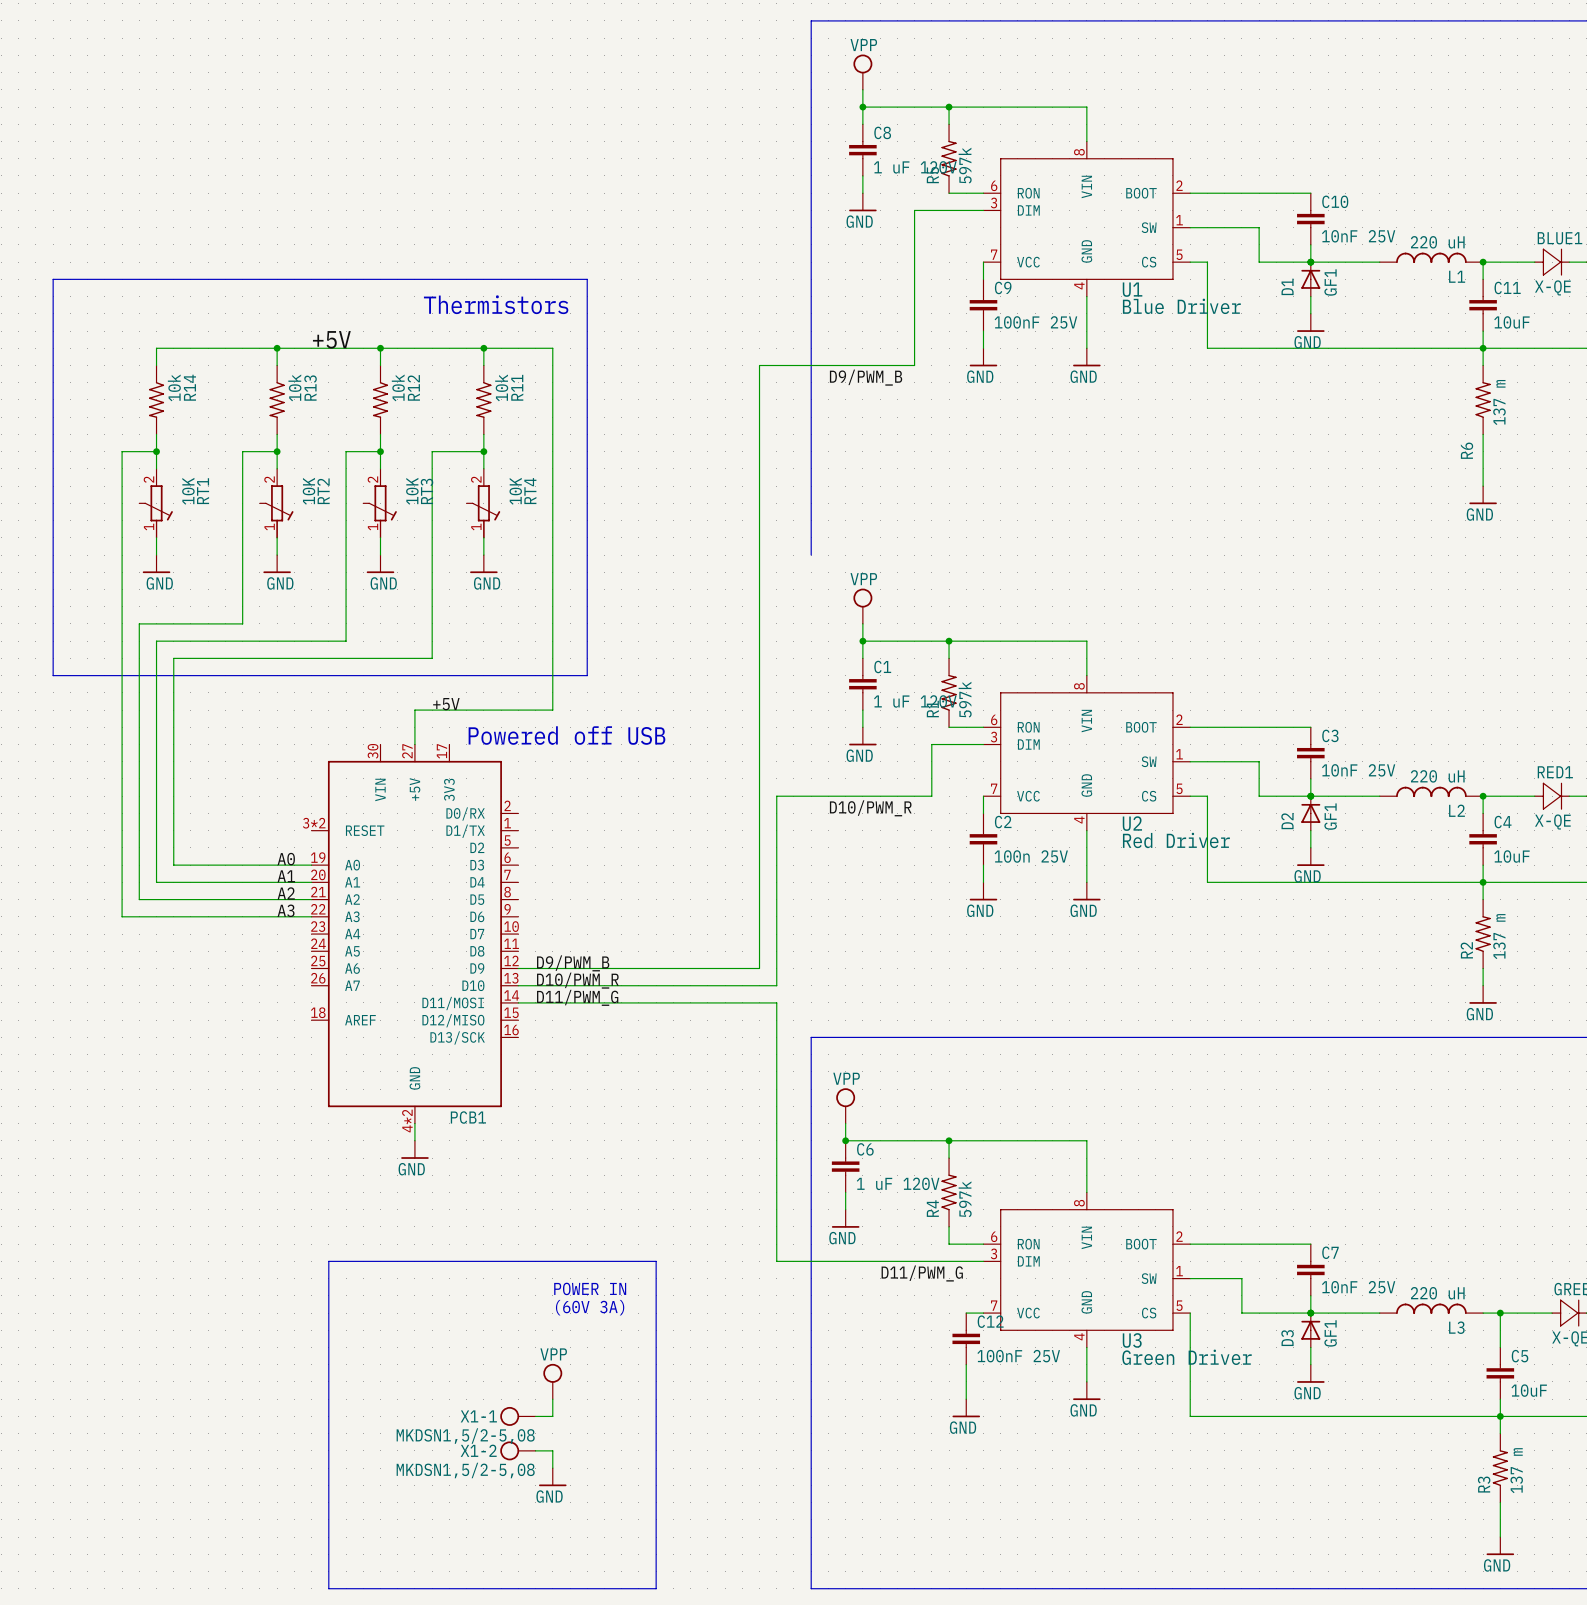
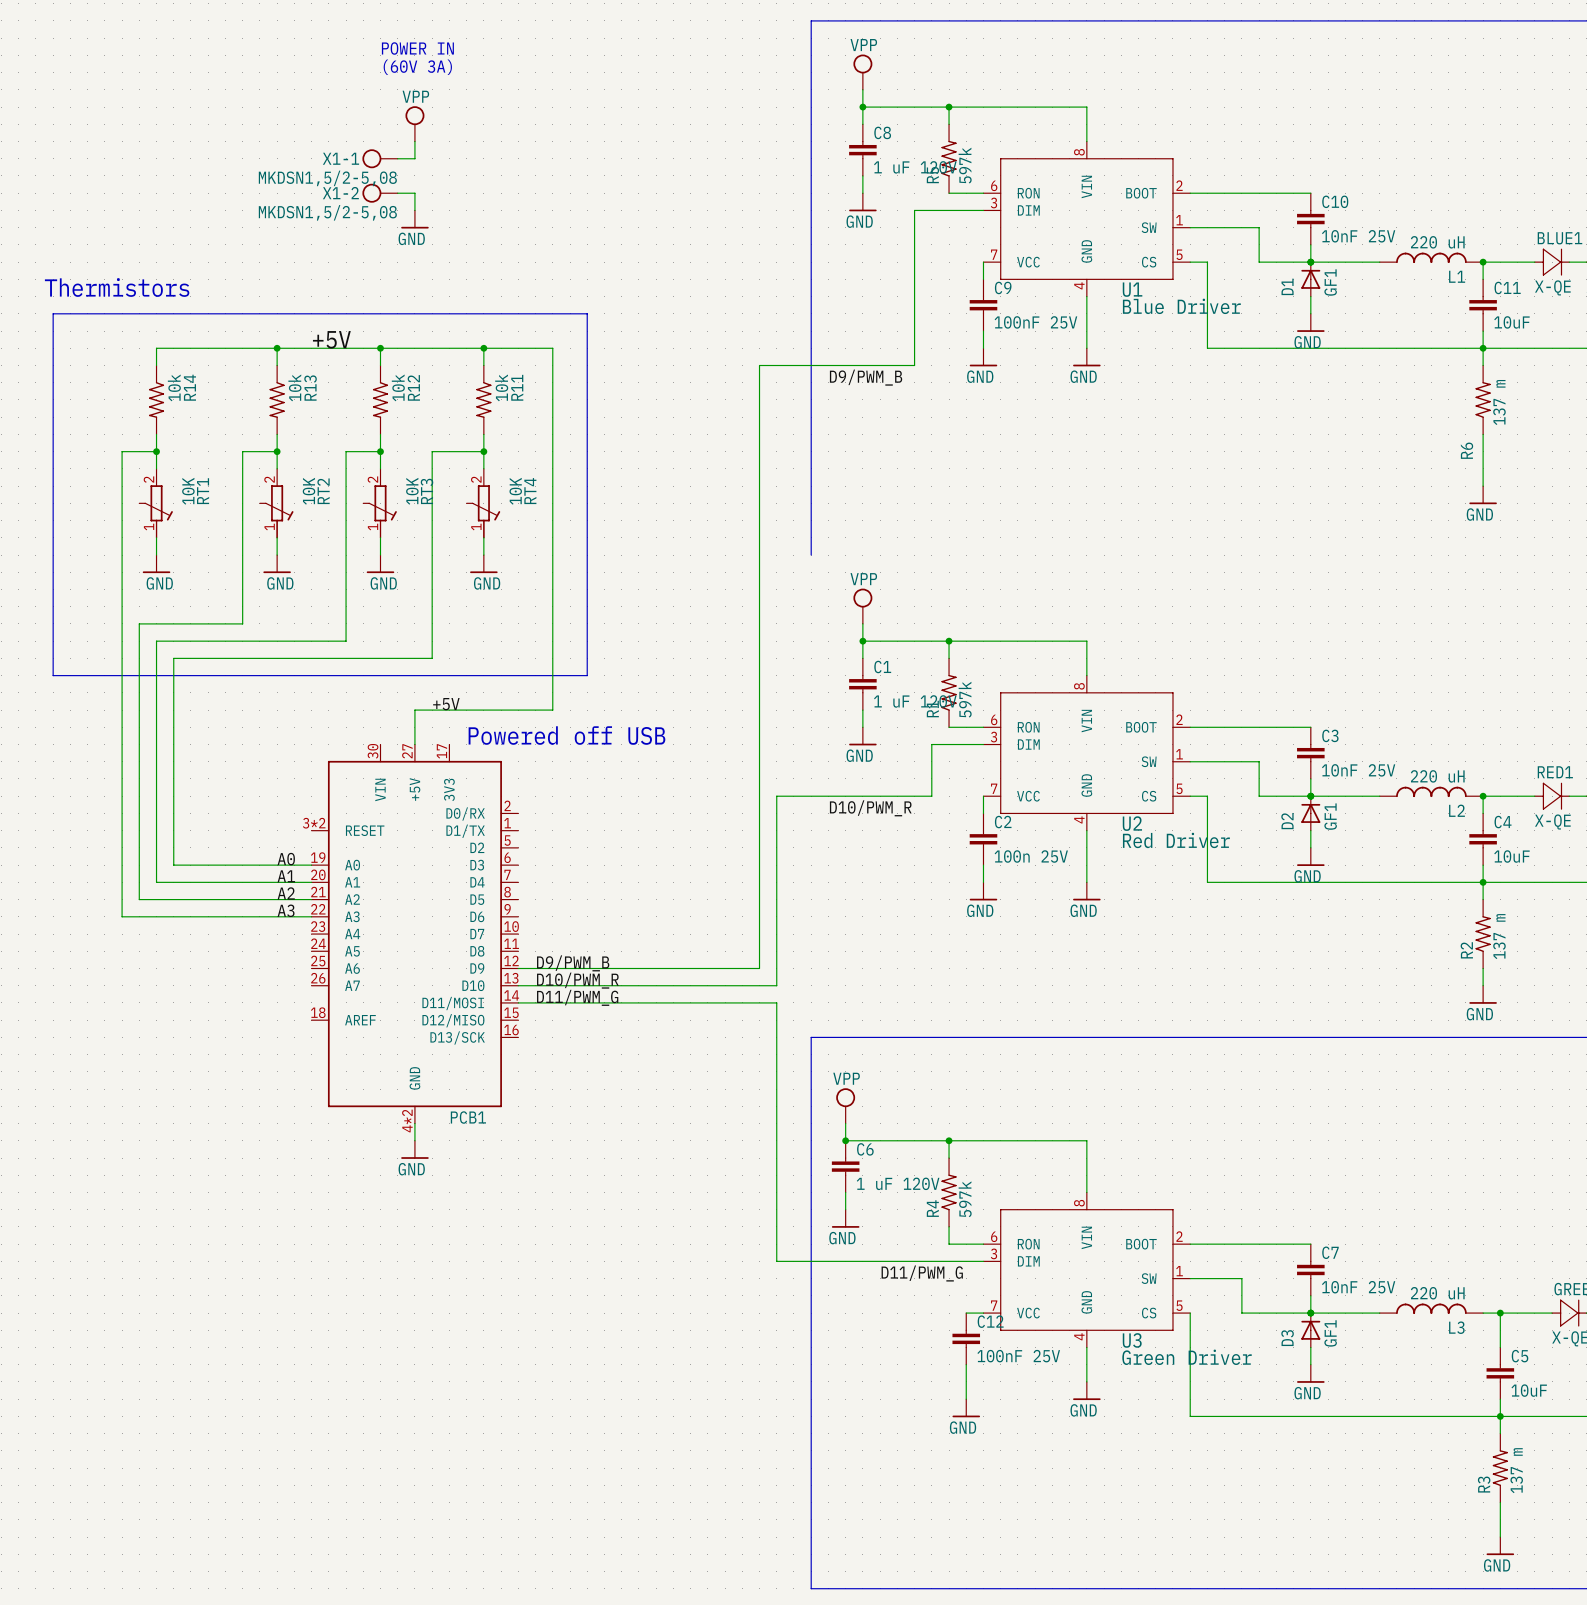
text: none -> POWER IN (417, 48)
text: none -> (60V 3A) (417, 67)
power symbol: none -> VPP (414, 123)
wire: none -> (414, 141) (414, 158) (397, 158)
wire: none -> (397, 193) (414, 193) (414, 210)
power symbol: none -> GND (414, 219)
text: none -> Thermistors (117, 287)
text: Thermistors (496, 304) -> none
line: (53, 313) (53, 279) (587, 279) (587, 313) -> (53, 313) (587, 313)
line: (328, 1261) (656, 1261) (656, 1588) (328, 1588) (328, 1261) -> none
text: POWER IN (590, 1288) -> none
text: (60V 3A) (590, 1307) -> none
power symbol: VPP (552, 1381) -> none
wire: (552, 1399) (552, 1416) (535, 1416) -> none
X1-1 position: (517, 1416) -> (380, 158)
X1-2 position: (517, 1450) -> (380, 193)
wire: (535, 1450) (552, 1450) (552, 1468) -> none
power symbol: GND (552, 1477) -> none

